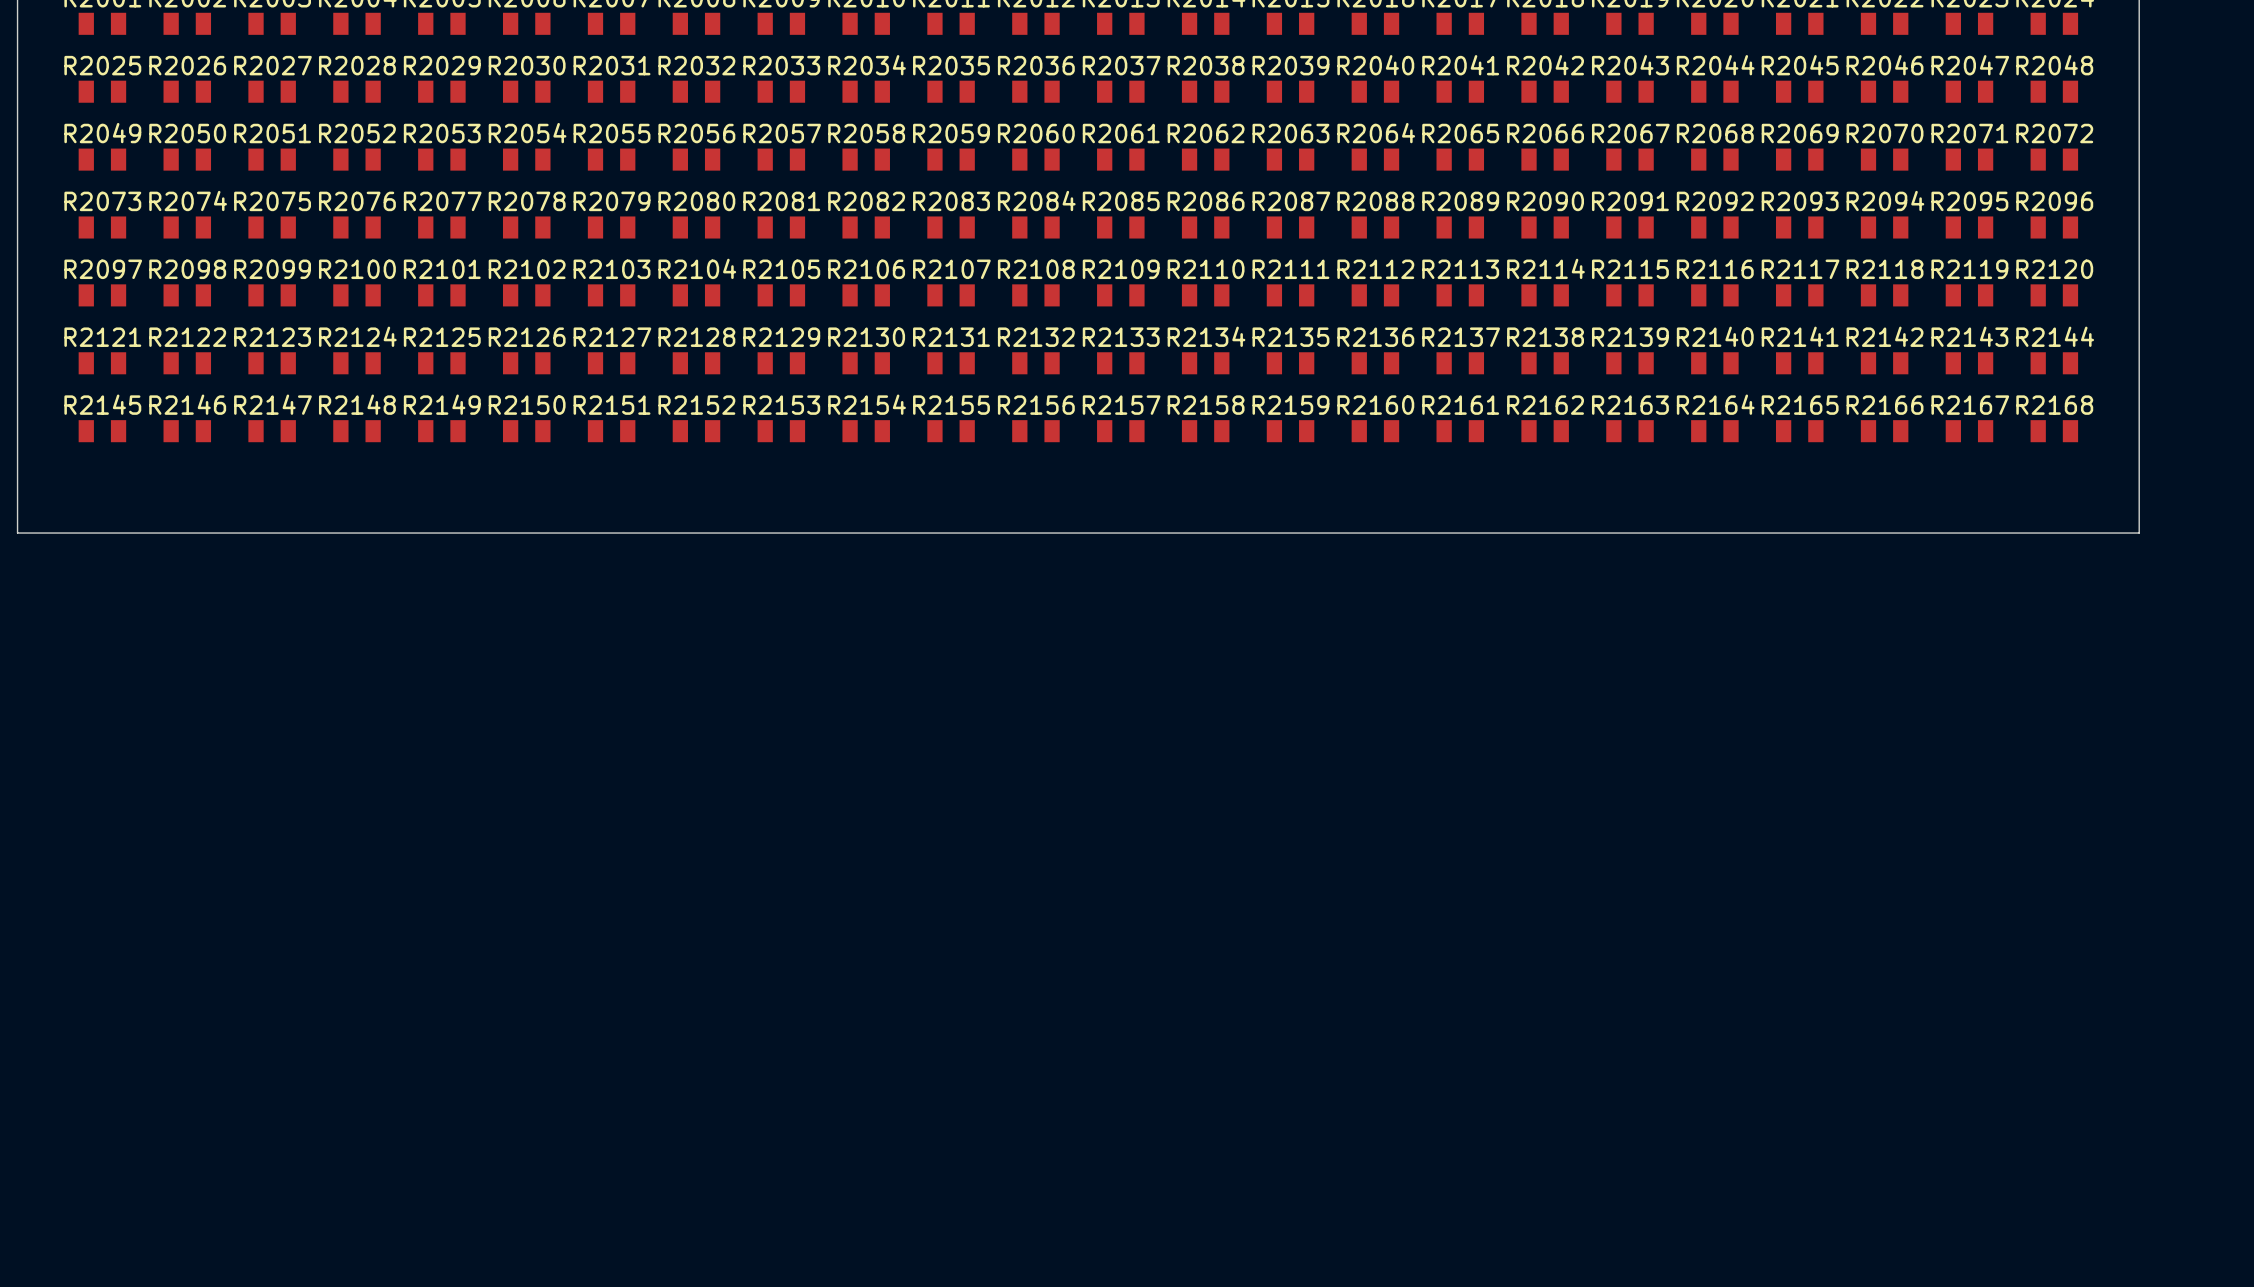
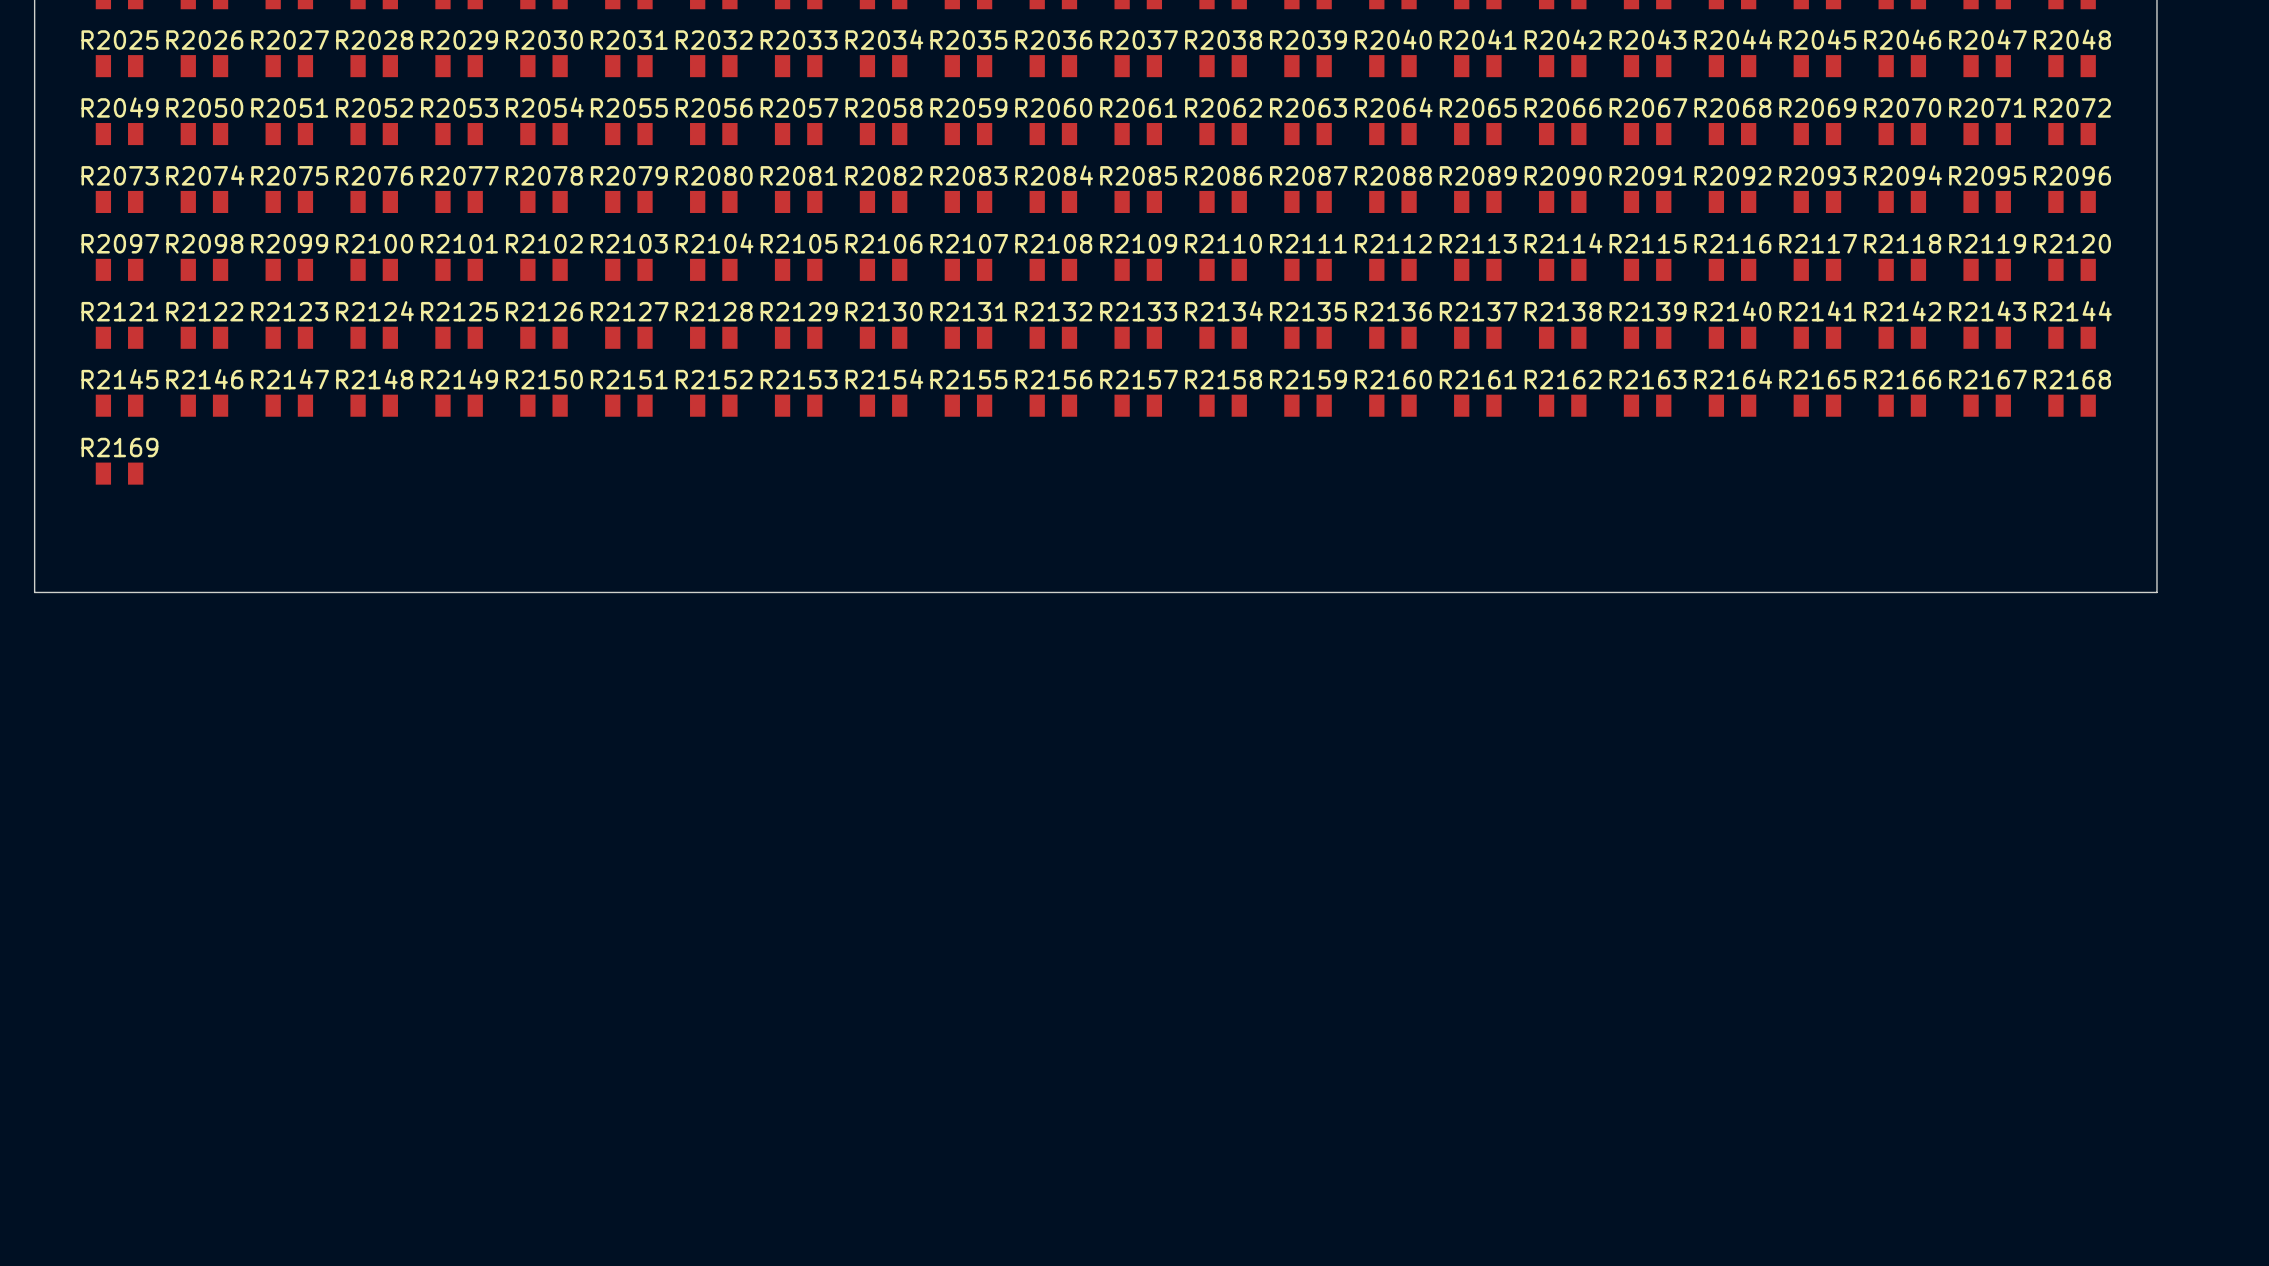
R2169: none -> (119, 473)
board edge: (17, 533) (2139, 533) -> (34, 507) (34, 592) (2156, 592) (2156, 507)

